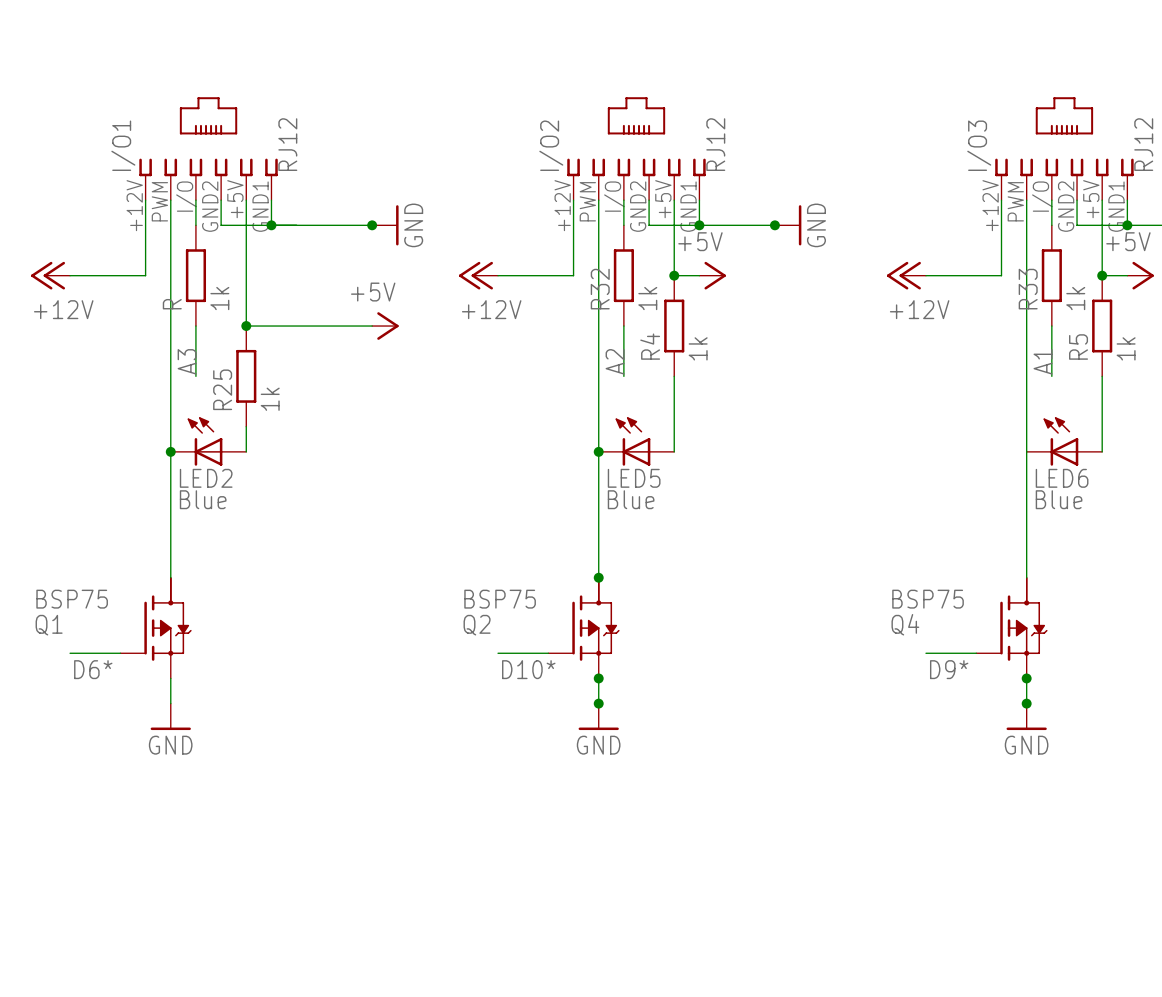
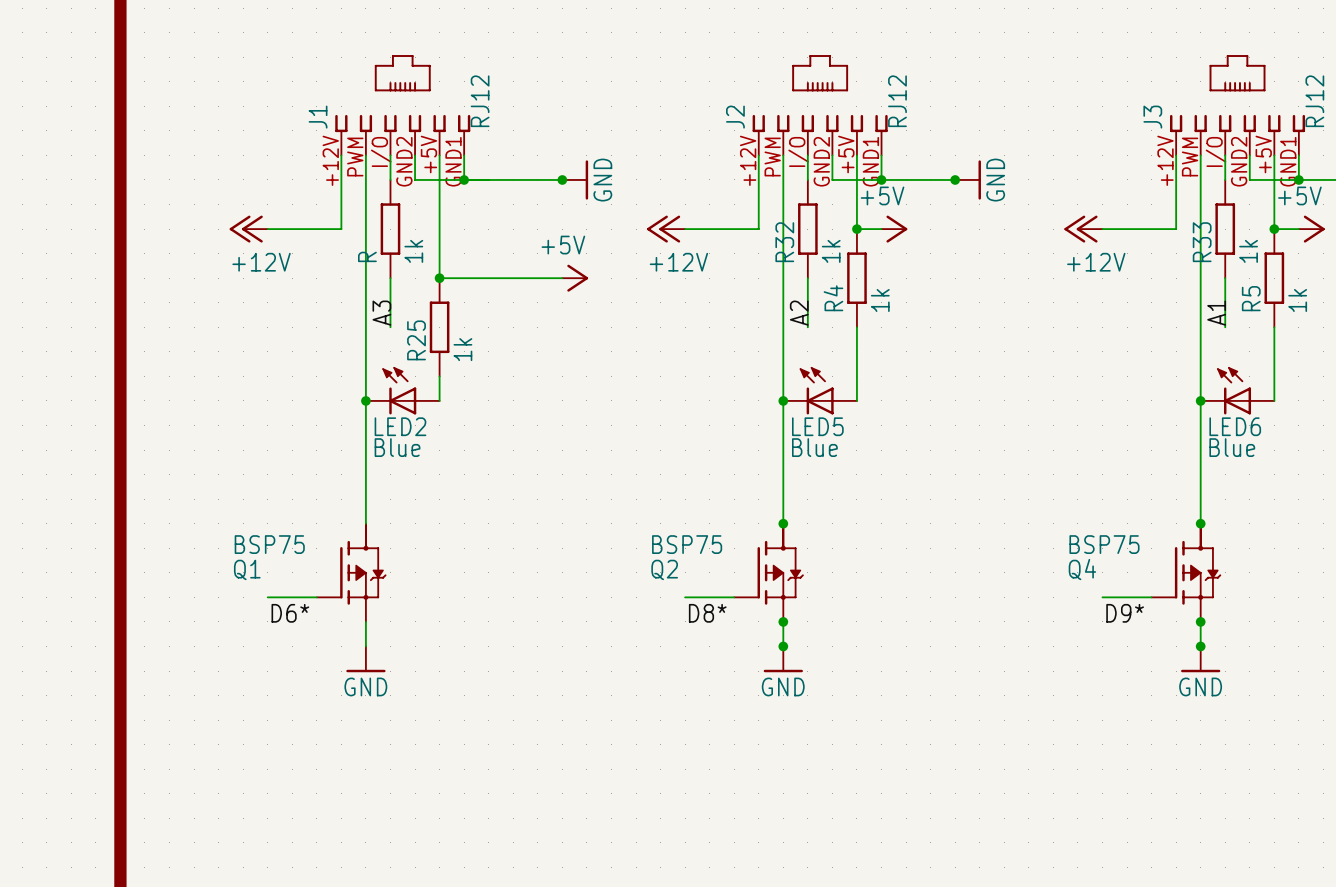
I/O1 name: I/O1 (123, 145) -> J1 (318, 117)
I/O2 name: I/O2 (551, 145) -> J2 (735, 117)
I/O3 name: I/O3 (979, 145) -> J3 (1152, 117)
junction: none -> (1200, 400)
junction: none -> (1200, 523)
label: D10* (528, 669) -> D8* (707, 613)

